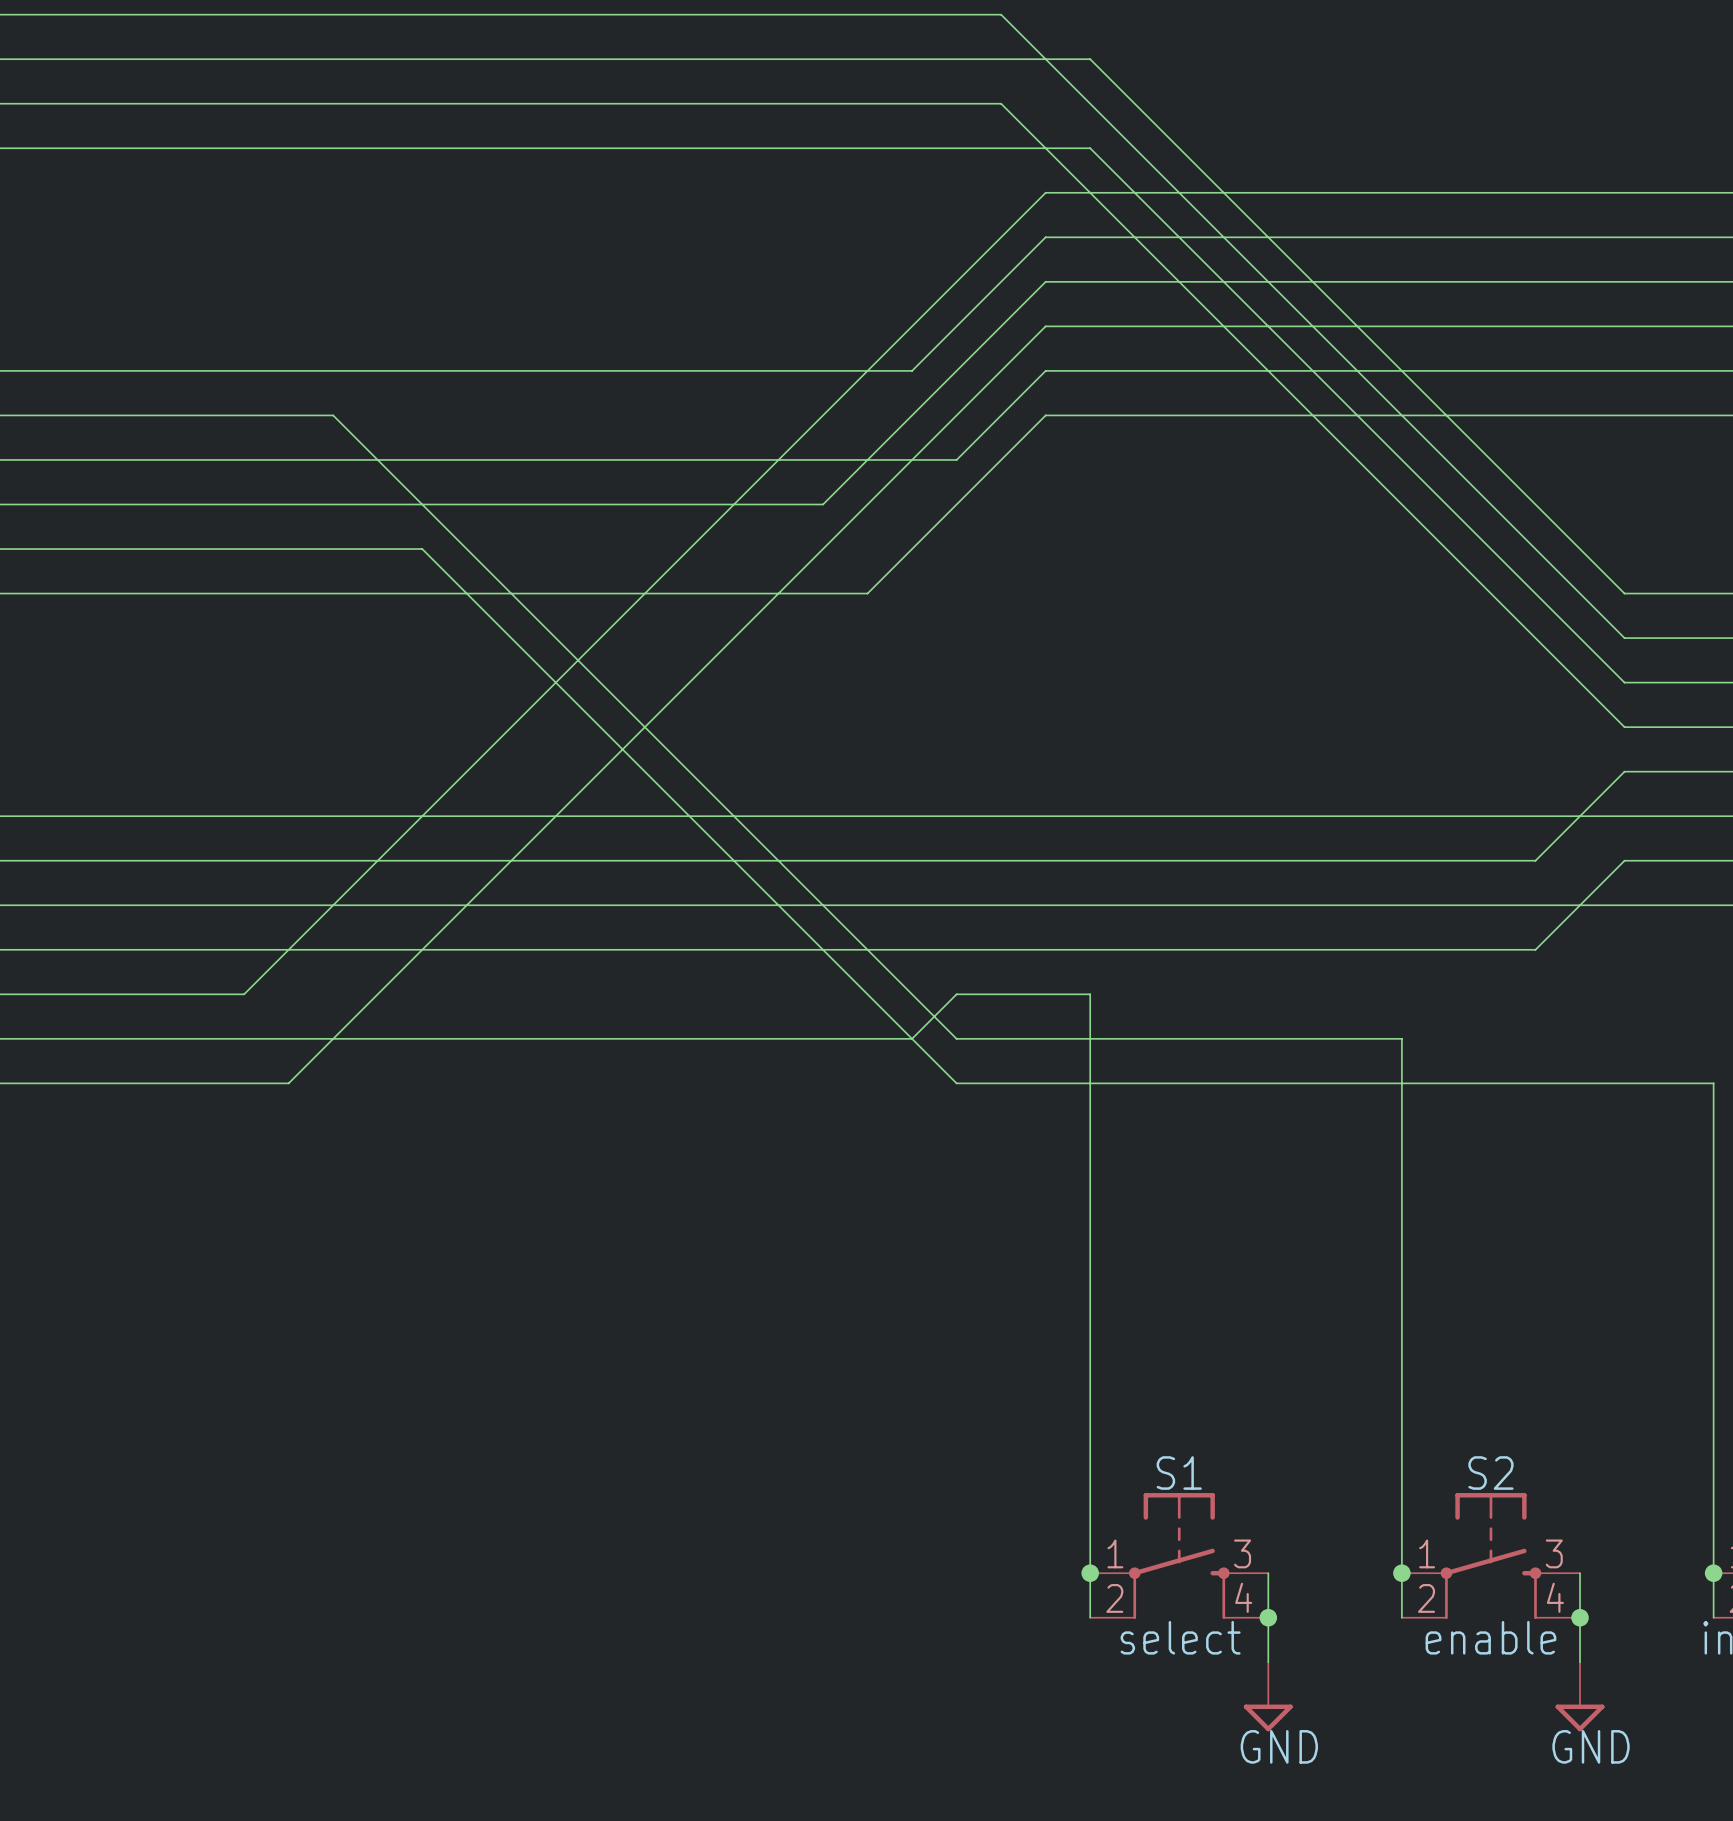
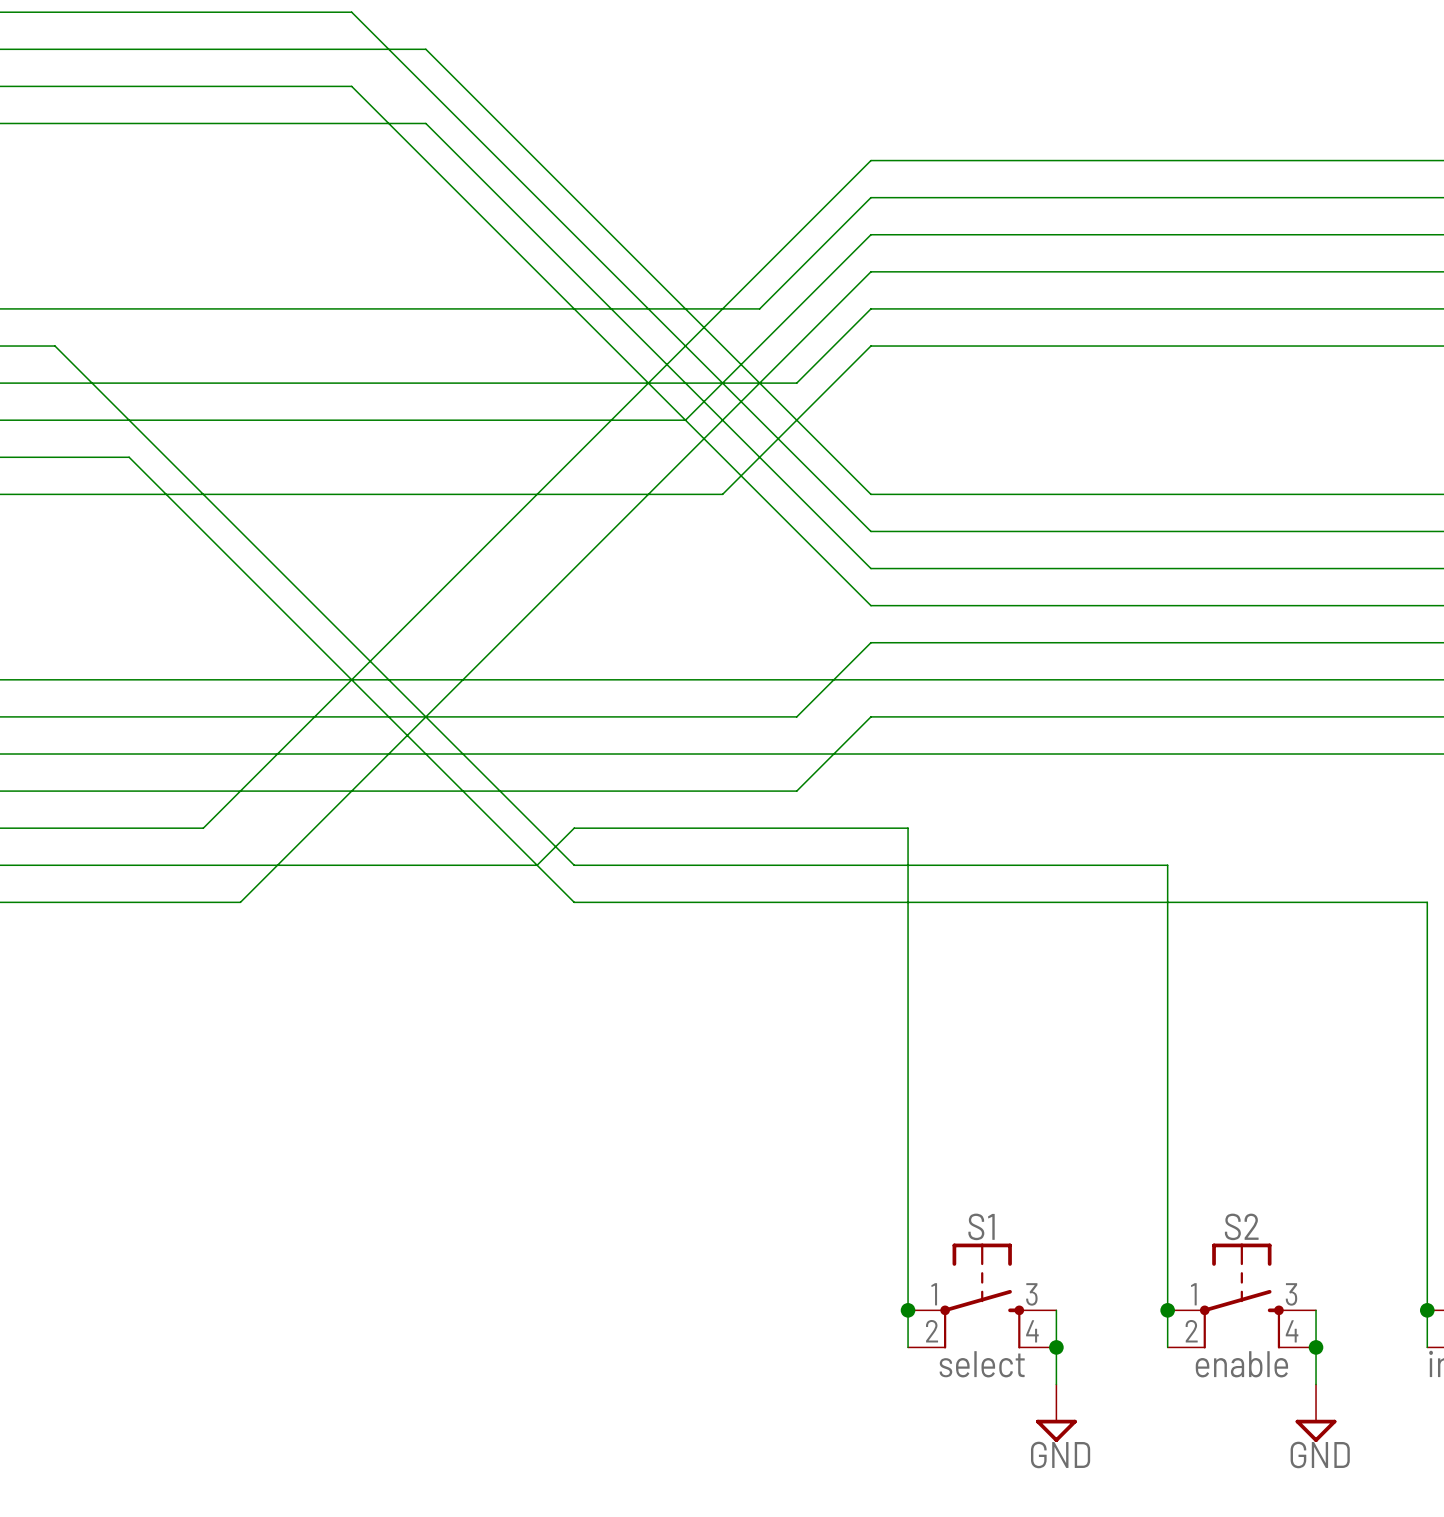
wire: (422, 14) (1001, 14) (1624, 638) -> (351, 12) (870, 531) (1353, 531)
wire: (511, 59) (1090, 59) (1624, 593) -> (425, 49) (870, 494) (1353, 494)
wire: (422, 103) (1001, 103) (1624, 727) -> (351, 86) (870, 605) (1353, 605)
wire: (511, 148) (1090, 148) (1624, 682) -> (425, 123) (870, 568) (1353, 568)
wire: (66, 415) (333, 415) (956, 1038) -> (54, 346) (574, 865)
wire: (155, 549) (422, 549) (956, 1083) -> (129, 457) (574, 902) (796, 902)
wire: (1624, 771) (1535, 860) -> (1353, 716) (1278, 716)
wire: none -> (1353, 642) (870, 642) (796, 716)
wire: (956, 860) (1045, 860) -> (796, 791) (870, 716)
wire: (1624, 860) (1535, 949) (956, 949) -> none
wire: (956, 994) (912, 1038) -> (796, 865) (759, 865)
wire: (644, 1038) (689, 1038) -> (537, 865) (574, 828) (796, 828)

